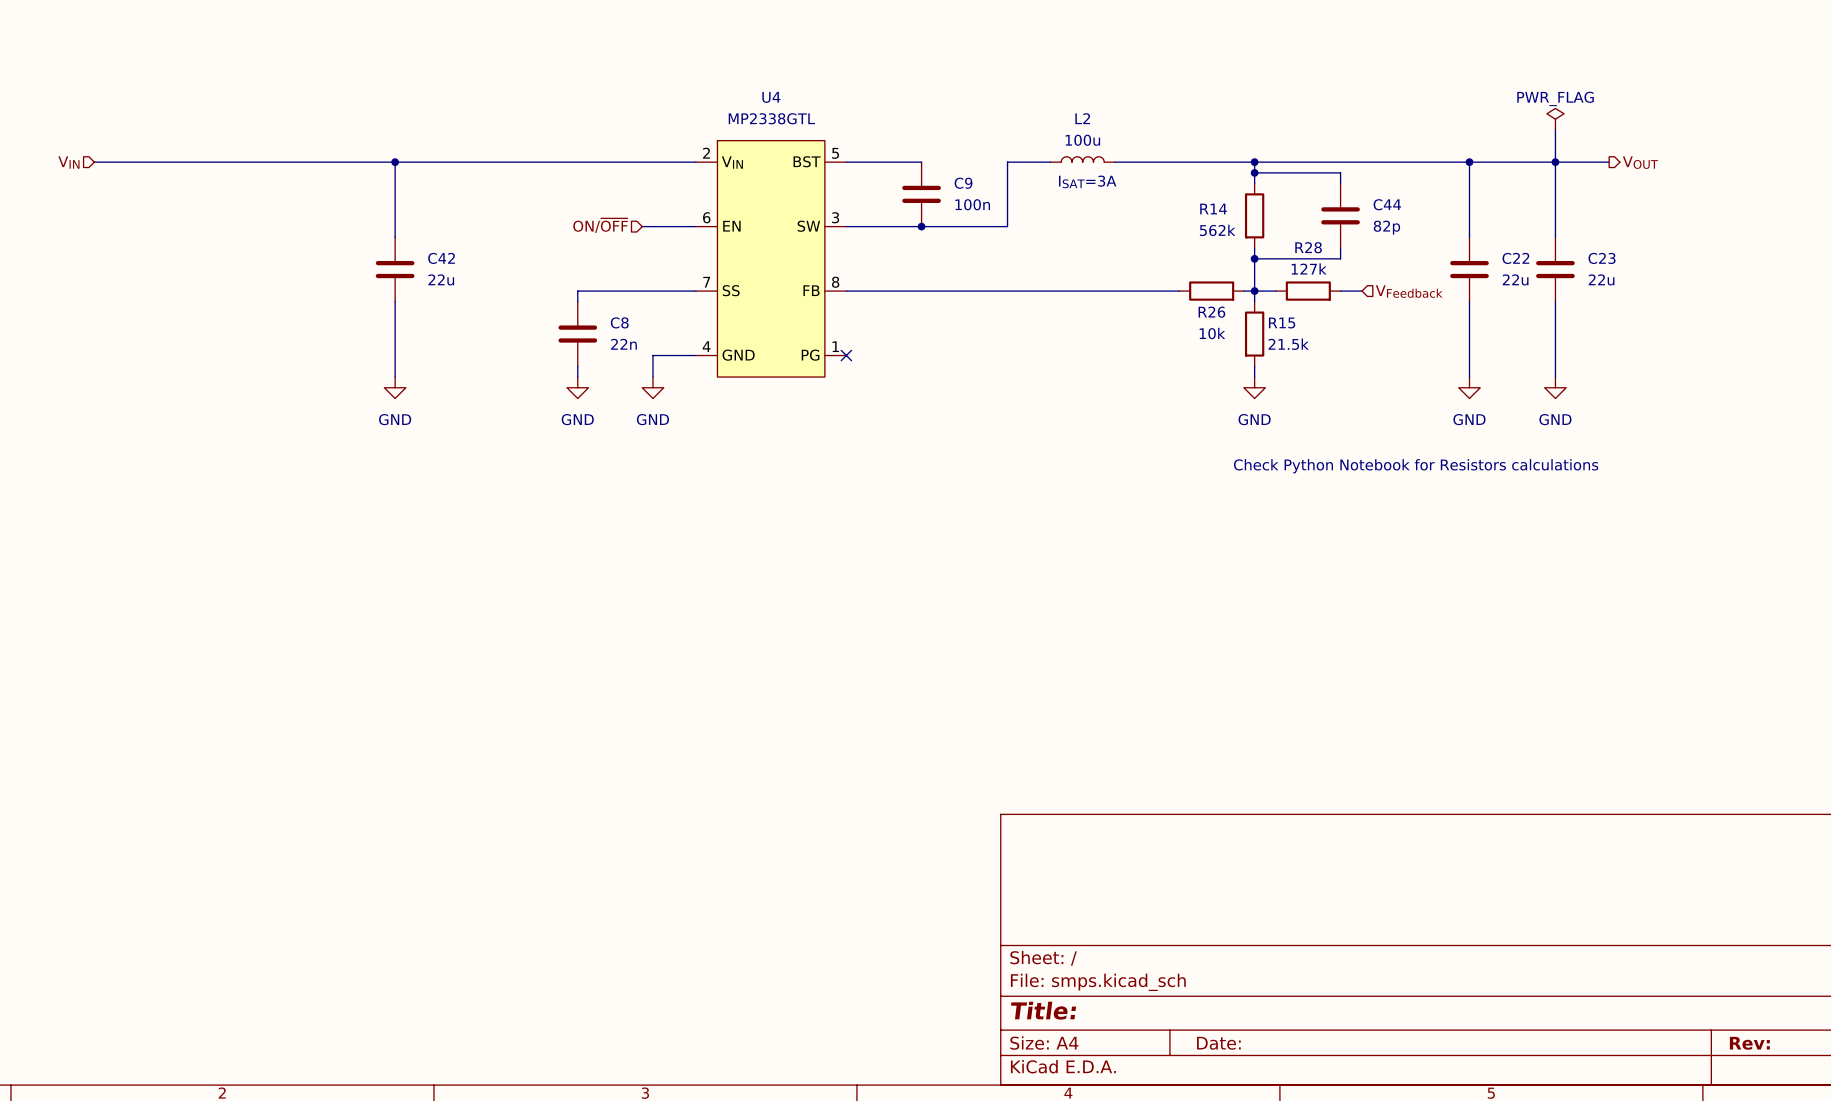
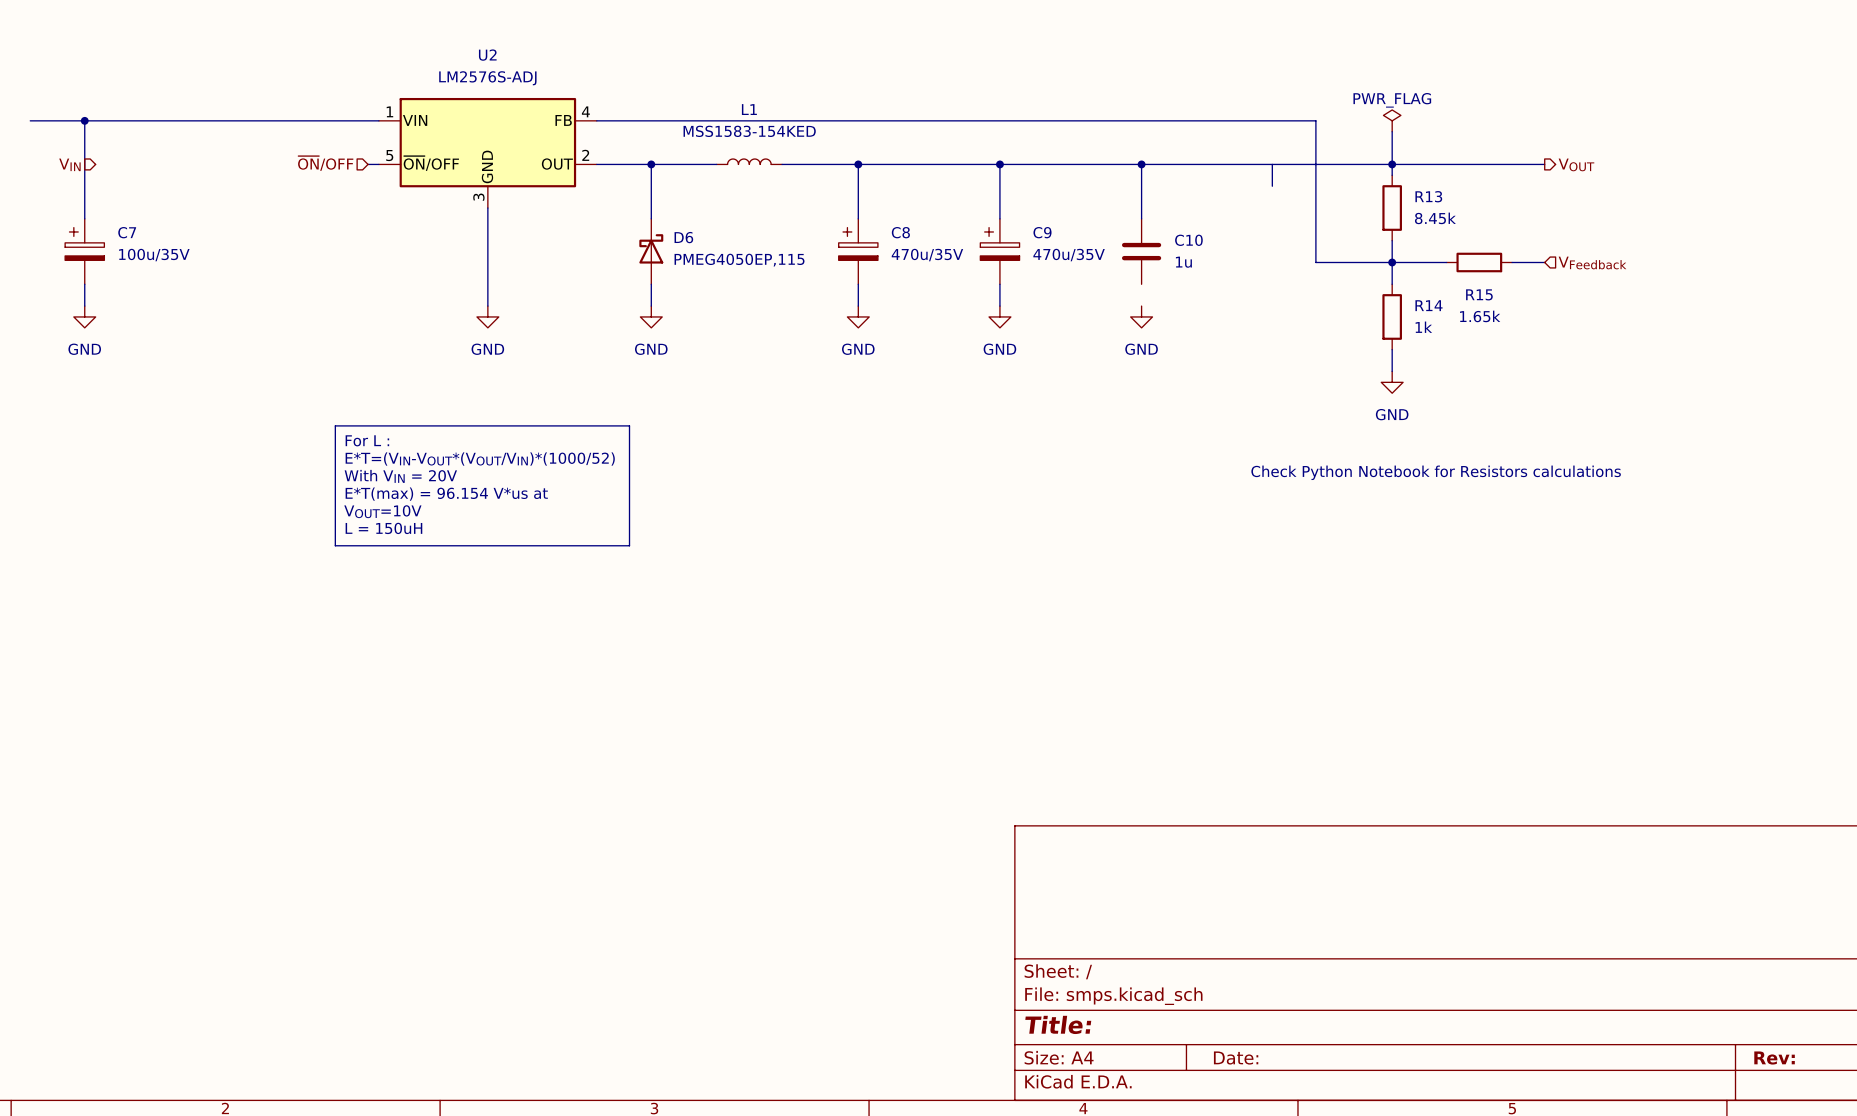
wire: none -> (30, 120) (378, 120)
wire: none -> (84, 120) (84, 218)
junction: none -> (84, 120)
power symbol position: PWR_FLAG (1555, 119) -> PWR_FLAG (1392, 120)
wire: none -> (1392, 131) (1392, 175)
wire: (1555, 129) (1555, 237) -> none
U2: none -> LM2576S-ADJ (487, 152)
L1: none -> MSS1583-154KED (749, 161)
L2: 100u (1082, 159) -> none
hierarchical label: none -> ~{ON}/OFF (325, 163)
wire: (94, 162) (362, 162) -> none
wire: (395, 162) (395, 237) -> none
junction: (395, 162) -> none
wire: none -> (651, 164) (651, 218)
junction: none -> (651, 164)
wire: none -> (782, 164) (858, 164) (858, 218)
junction: none -> (858, 164)
C9 symbol: [902, 162, 941, 227] -> [980, 218, 1020, 285]
wire: none -> (999, 164) (999, 218)
junction: none -> (999, 164)
wire: (1007, 162) (1007, 226) (846, 226) -> (1021, 164) (934, 164)
wire: none -> (1065, 164) (1130, 164)
junction: none -> (1141, 164)
junction: (1254, 162) -> none
junction: none -> (1392, 164)
wire: (1469, 162) (1469, 237) -> none
junction: (1469, 162) -> none
wire: (1523, 162) (1609, 162) -> none
junction: (1555, 162) -> none
hierarchical label position: VOUT (1640, 162) -> VOUT (1576, 164)
wire: (1254, 172) (1340, 172) (1340, 183) -> none
junction: (1254, 172) -> none
text: ISAT=3A (1087, 181) -> none
C9 value: 100n (972, 204) -> 470u/35V (1069, 255)
wire: none -> (487, 208) (487, 306)
R13: none -> 8.45k (1392, 208)
R14 name position: R14 (1213, 209) -> R14 (1428, 305)
R14 position: (1254, 215) -> (1392, 316)
C44: 82p (1340, 215) -> none
hierarchical label: ON/~{OFF} (600, 225) -> none
wire: (642, 226) (695, 226) -> none
junction: (921, 226) -> none
R14 value: 562k (1217, 230) -> 1k (1423, 327)
wire: none -> (1392, 240) (1392, 284)
C7: none -> 100u/35V (84, 251)
D6: none -> PMEG4050EP,115 (651, 251)
C10: none -> 1u (1141, 251)
wire: (1254, 248) (1254, 301) -> (1141, 164) (1141, 218)
wire: (1340, 248) (1340, 258) -> (1446, 262) (1359, 262)
U4: MP2338GTL (771, 258) -> none
wire: (1254, 258) (1297, 258) -> (596, 120) (1315, 120) (1315, 262)
junction: (1254, 258) -> none
junction: none -> (1392, 262)
wire: none -> (1512, 262) (1544, 262)
C42: 22u (395, 269) -> none
C22: 22u (1469, 269) -> none
C23: 22u (1555, 269) -> none
wire: none -> (84, 284) (84, 306)
wire: none -> (651, 284) (651, 306)
wire: none -> (858, 284) (858, 306)
wire: none -> (999, 284) (999, 306)
wire: (695, 291) (577, 291) (577, 301) -> none
wire: (846, 291) (1179, 291) -> none
R26: 10k (1211, 291) -> none
wire: (1243, 291) (1276, 291) -> none
junction: (1254, 291) -> none
R28: 127k (1308, 291) -> none
wire: (1340, 291) (1362, 291) -> none
hierarchical label position: VFeedback (1409, 291) -> VFeedback (1592, 262)
wire: (395, 301) (395, 377) -> none
C8 symbol: [558, 301, 598, 367] -> [838, 218, 878, 285]
wire: (1469, 301) (1469, 377) -> none
wire: (1555, 301) (1555, 377) -> none
power symbol: none -> GND (84, 316)
power symbol: none -> GND (487, 316)
power symbol: none -> GND (651, 316)
power symbol: none -> GND (858, 316)
power symbol: none -> GND (999, 316)
power symbol: none -> GND (1141, 316)
R15 rotation: 0° (1254, 334) -> 90° clockwise (1479, 262)
R15 position: (1254, 334) -> (1479, 262)
C8 value: 22n (623, 344) -> 470u/35V (927, 255)
R15 value: 21.5k (1288, 344) -> 1.65k (1480, 316)
wire: none -> (1392, 349) (1392, 371)
wire: (695, 355) (652, 355) (652, 377) -> none
no-connect mark: (846, 355) -> none
wire: (577, 366) (577, 377) -> none
wire: (1254, 366) (1254, 377) -> none
power symbol: none -> GND (1392, 382)
power symbol: GND (395, 387) -> none
power symbol: GND (577, 387) -> none
power symbol: GND (652, 387) -> none
power symbol: GND (1254, 387) -> none
power symbol: GND (1469, 387) -> none
power symbol: GND (1555, 387) -> none
line: none -> (335, 425) (629, 425) (629, 545) (335, 545) (335, 425)
text: none -> For L : (367, 440)
text: none -> E*T=(VIN-VOUT*(VOUT/VIN)*(1000/52) (480, 459)
text: none -> With VIN = 20V (400, 476)
text: none -> E*T(max) = 96.154 V*us at (446, 494)
text: none -> VOUT=10V (382, 511)
text: none -> L = 150uH (383, 528)

